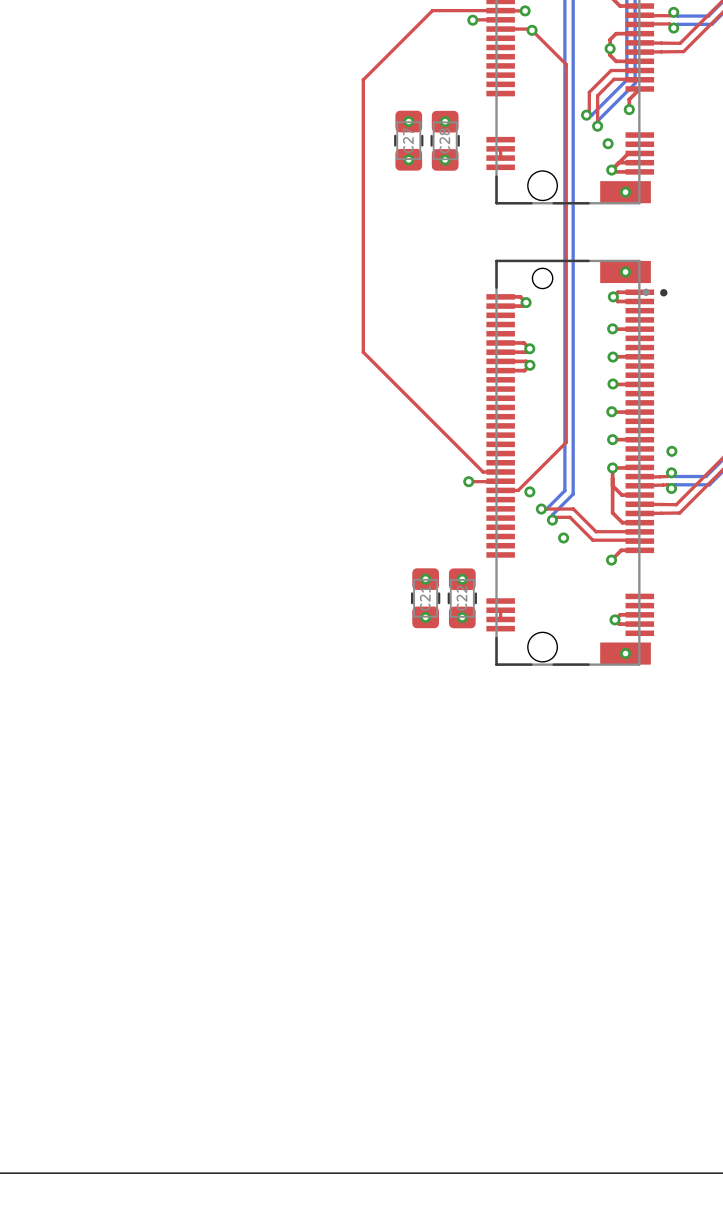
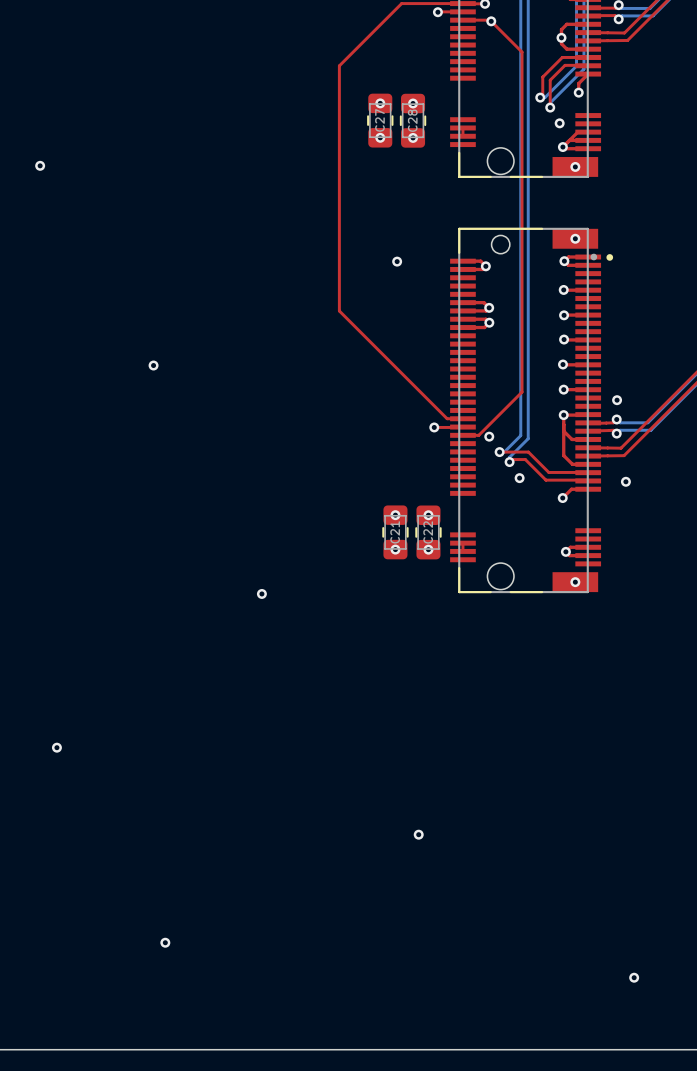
via: none -> (40, 165)
via: none -> (397, 261)
via: none -> (153, 365)
via: none -> (625, 481)
via: none -> (261, 593)
via: none -> (56, 747)
via: none -> (418, 834)
via: none -> (165, 942)
via: none -> (634, 977)

